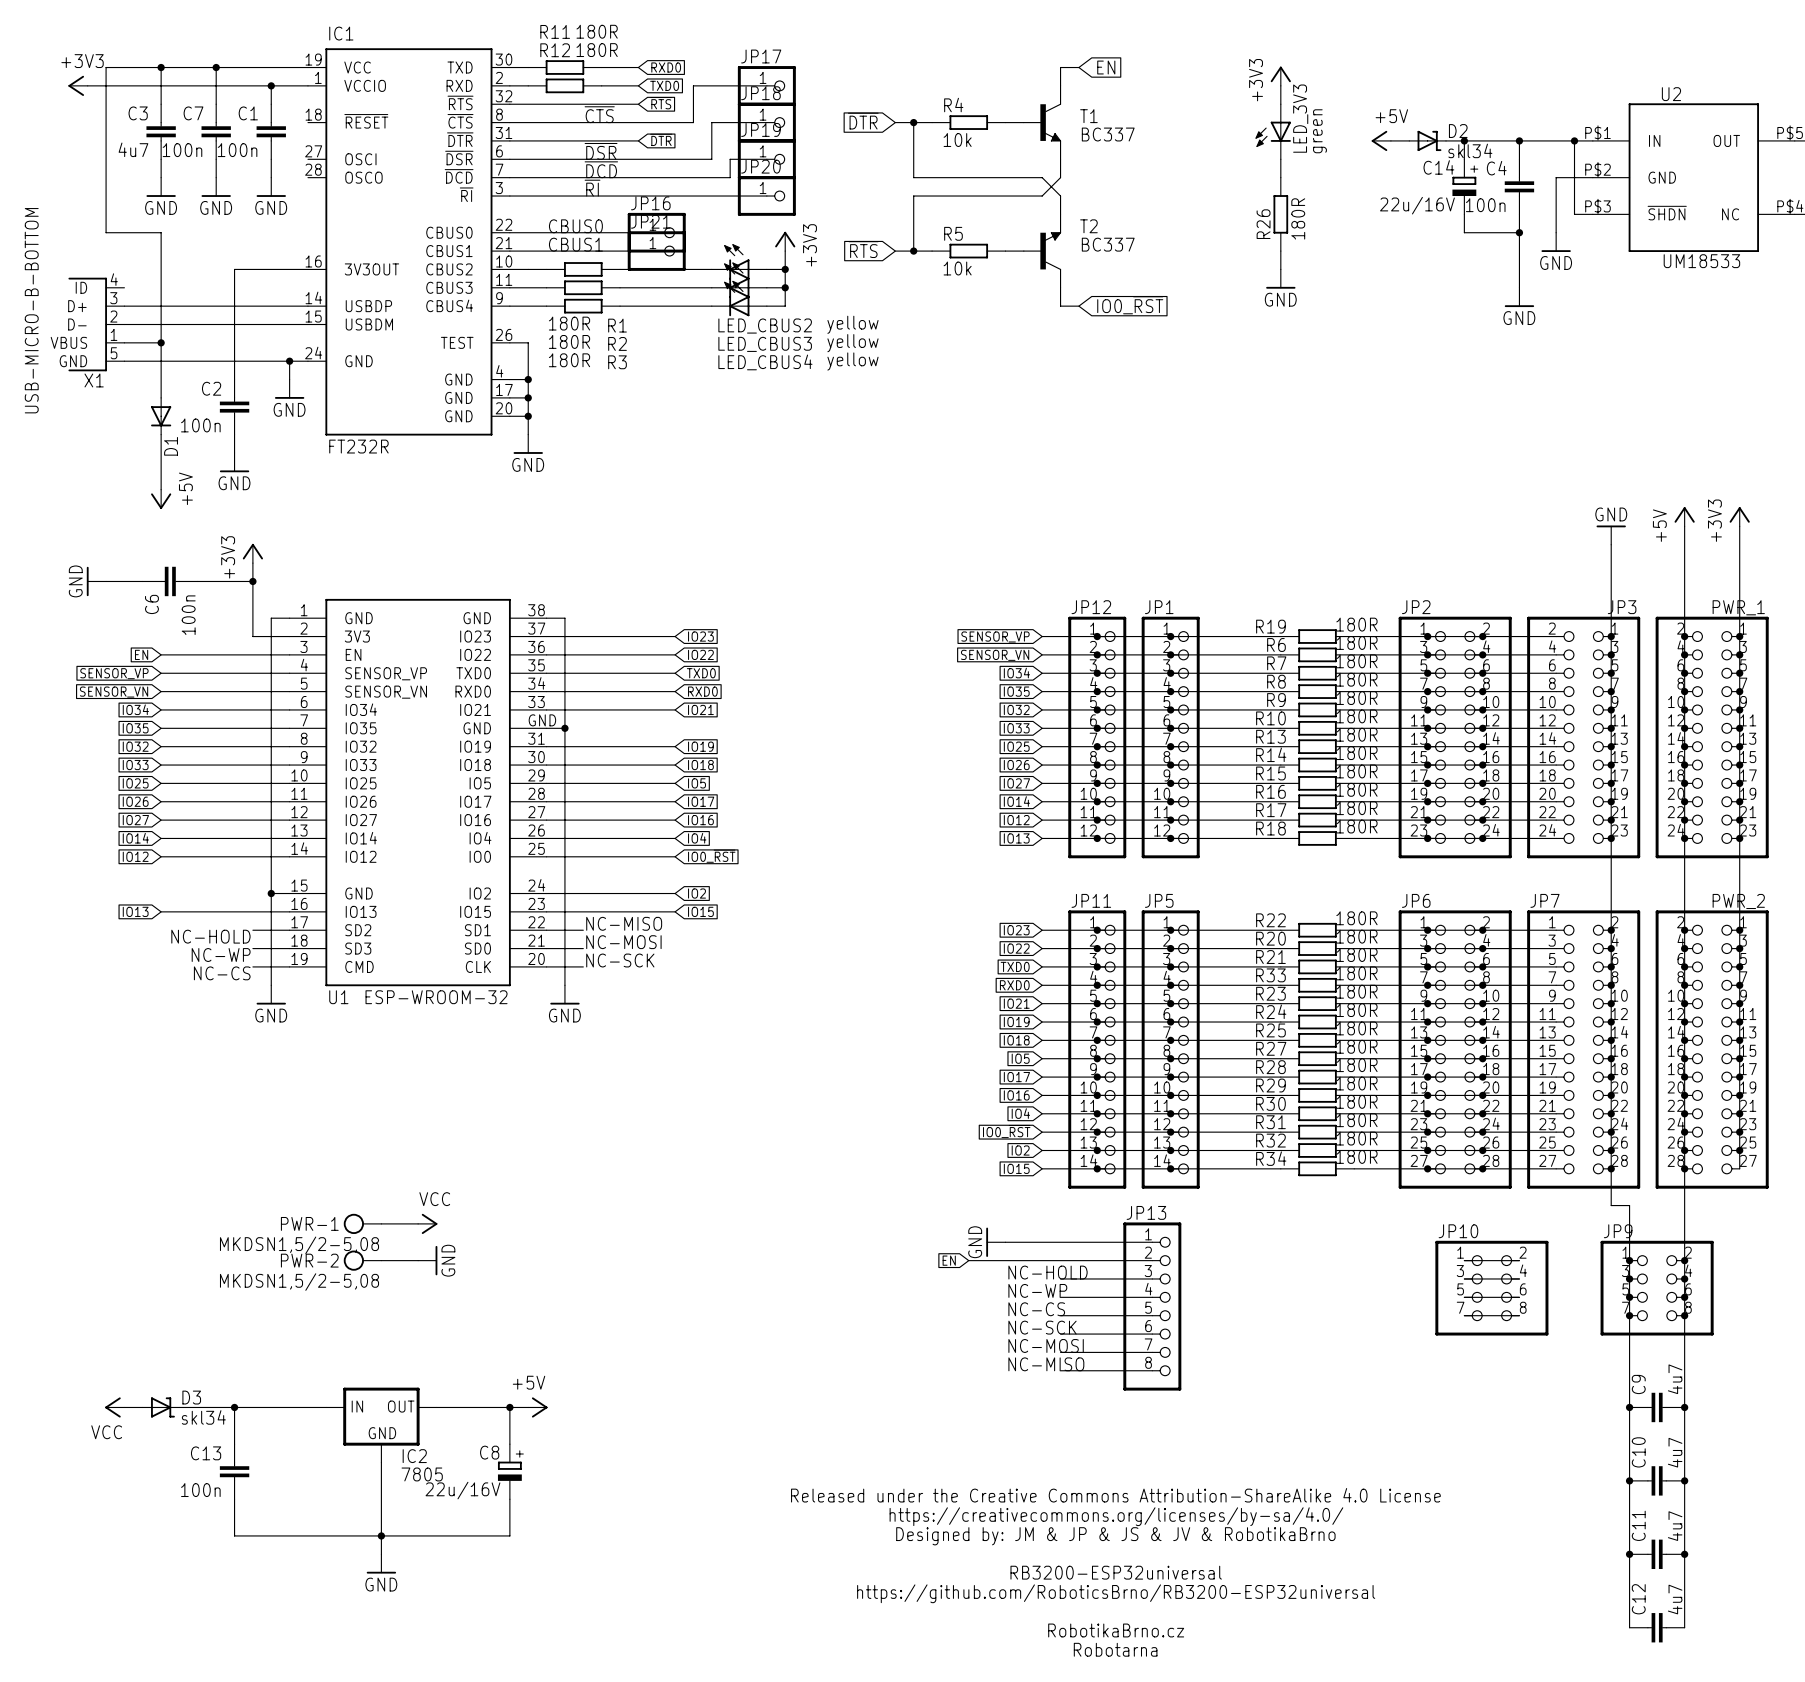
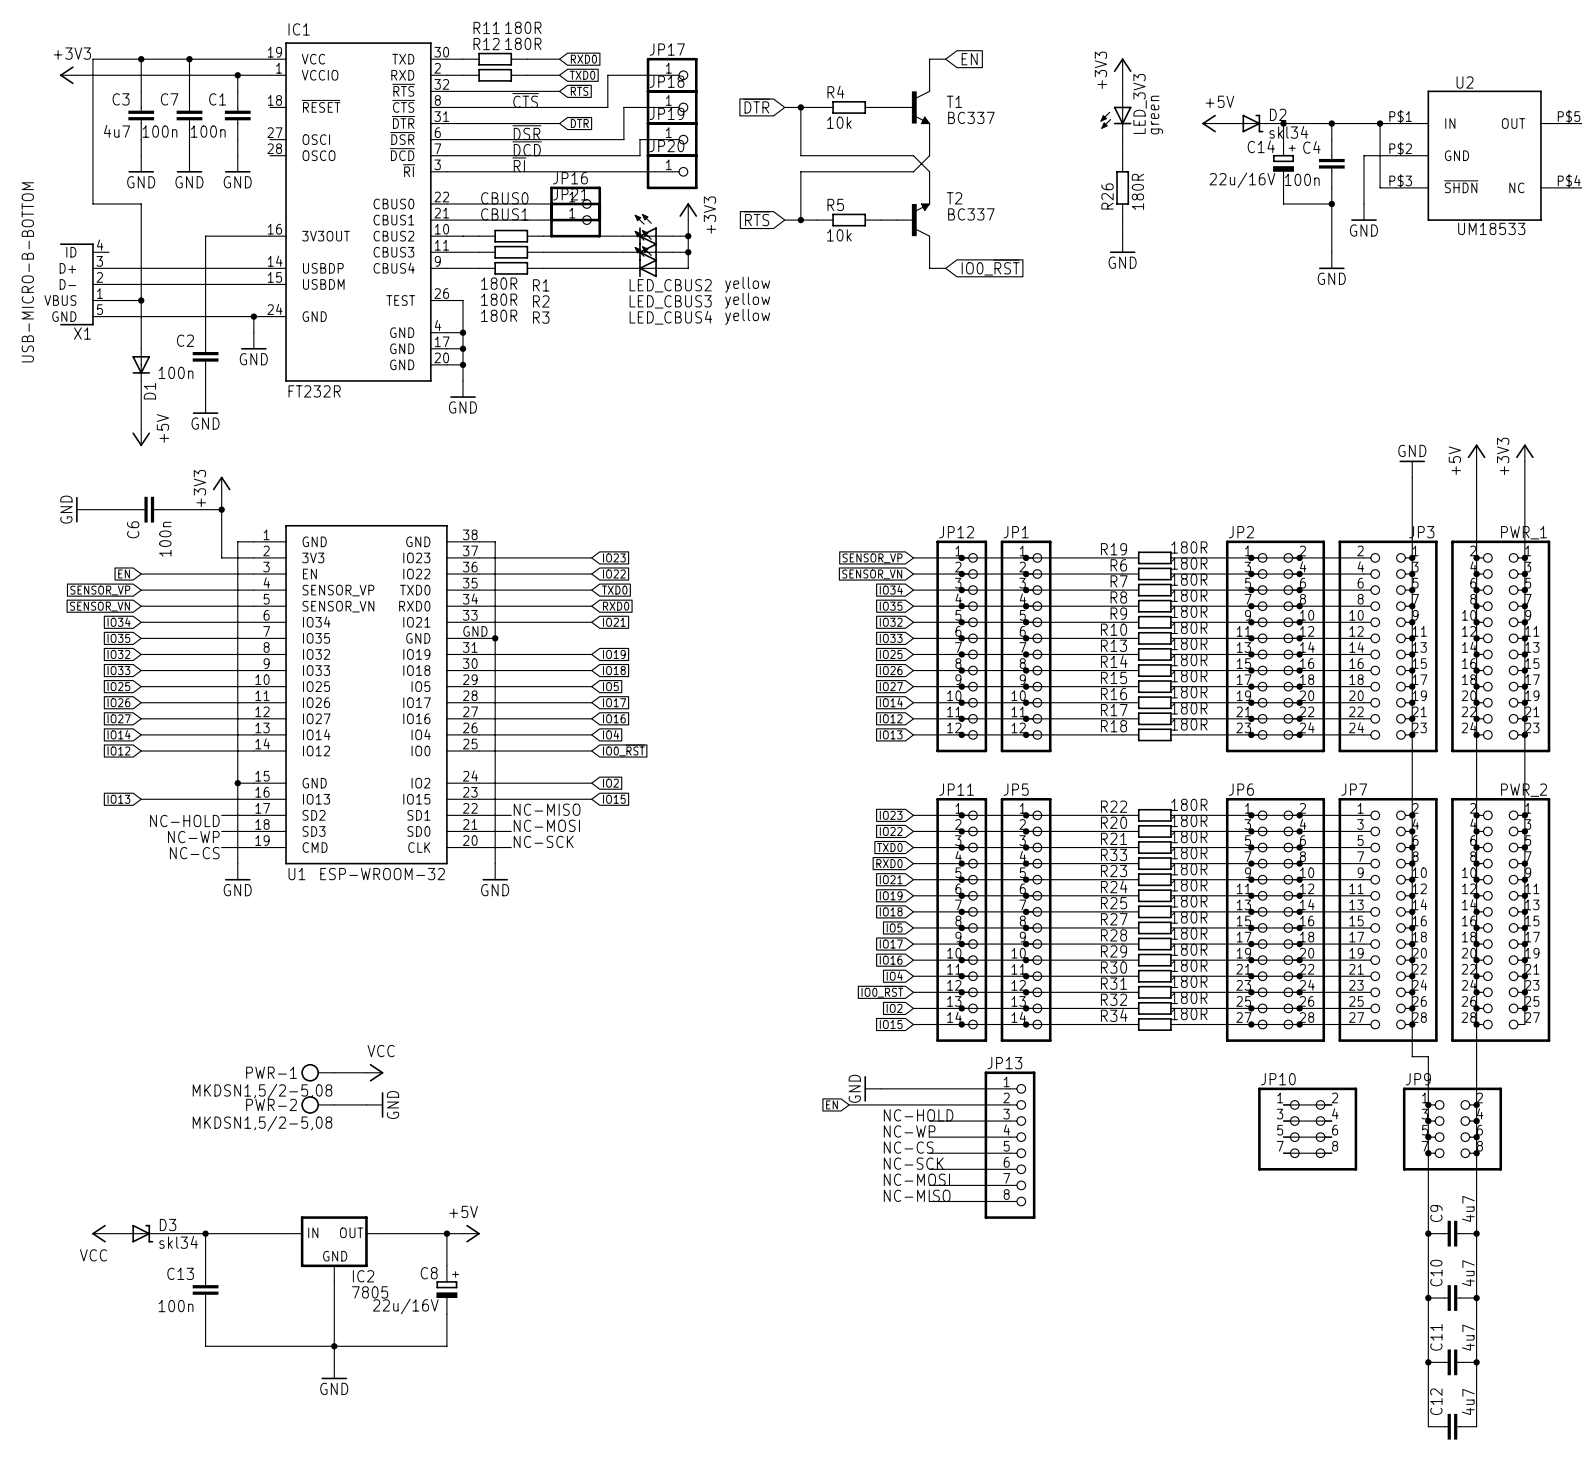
text: Released under the Creative Commons Attribution-ShareAlike 4.0 License (1115, 1495) -> none
text: https://creativecommons.org/licenses/by-sa/4.0/ (1116, 1516) -> none
text: Designed by: JM & JP & JS & JV & RobotikaBrno (1115, 1536) -> none
text: RB3200-ESP32universal (1116, 1572) -> none
text: https://github.com/RoboticsBrno/RB3200-ESP32universal (1116, 1593) -> none
text: RobotikaBrno.cz (1116, 1630) -> none
text: Robotarna (1115, 1649) -> none

